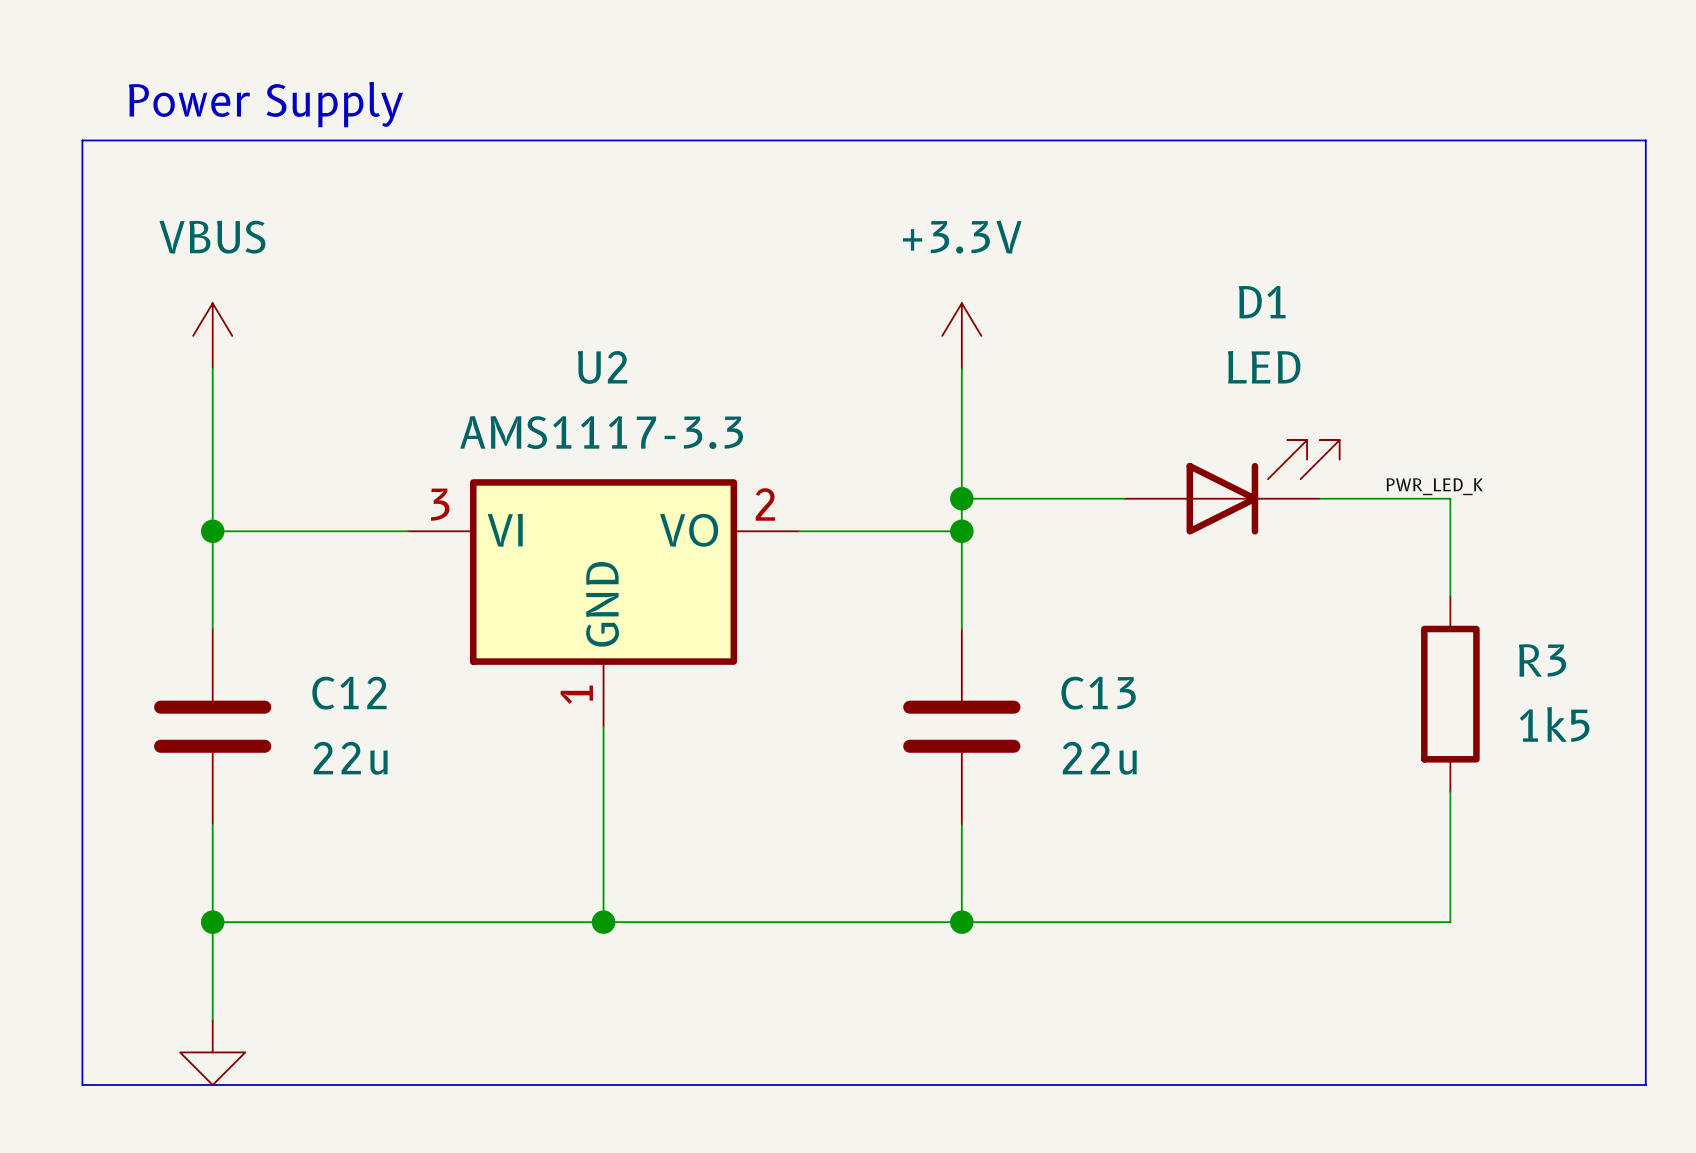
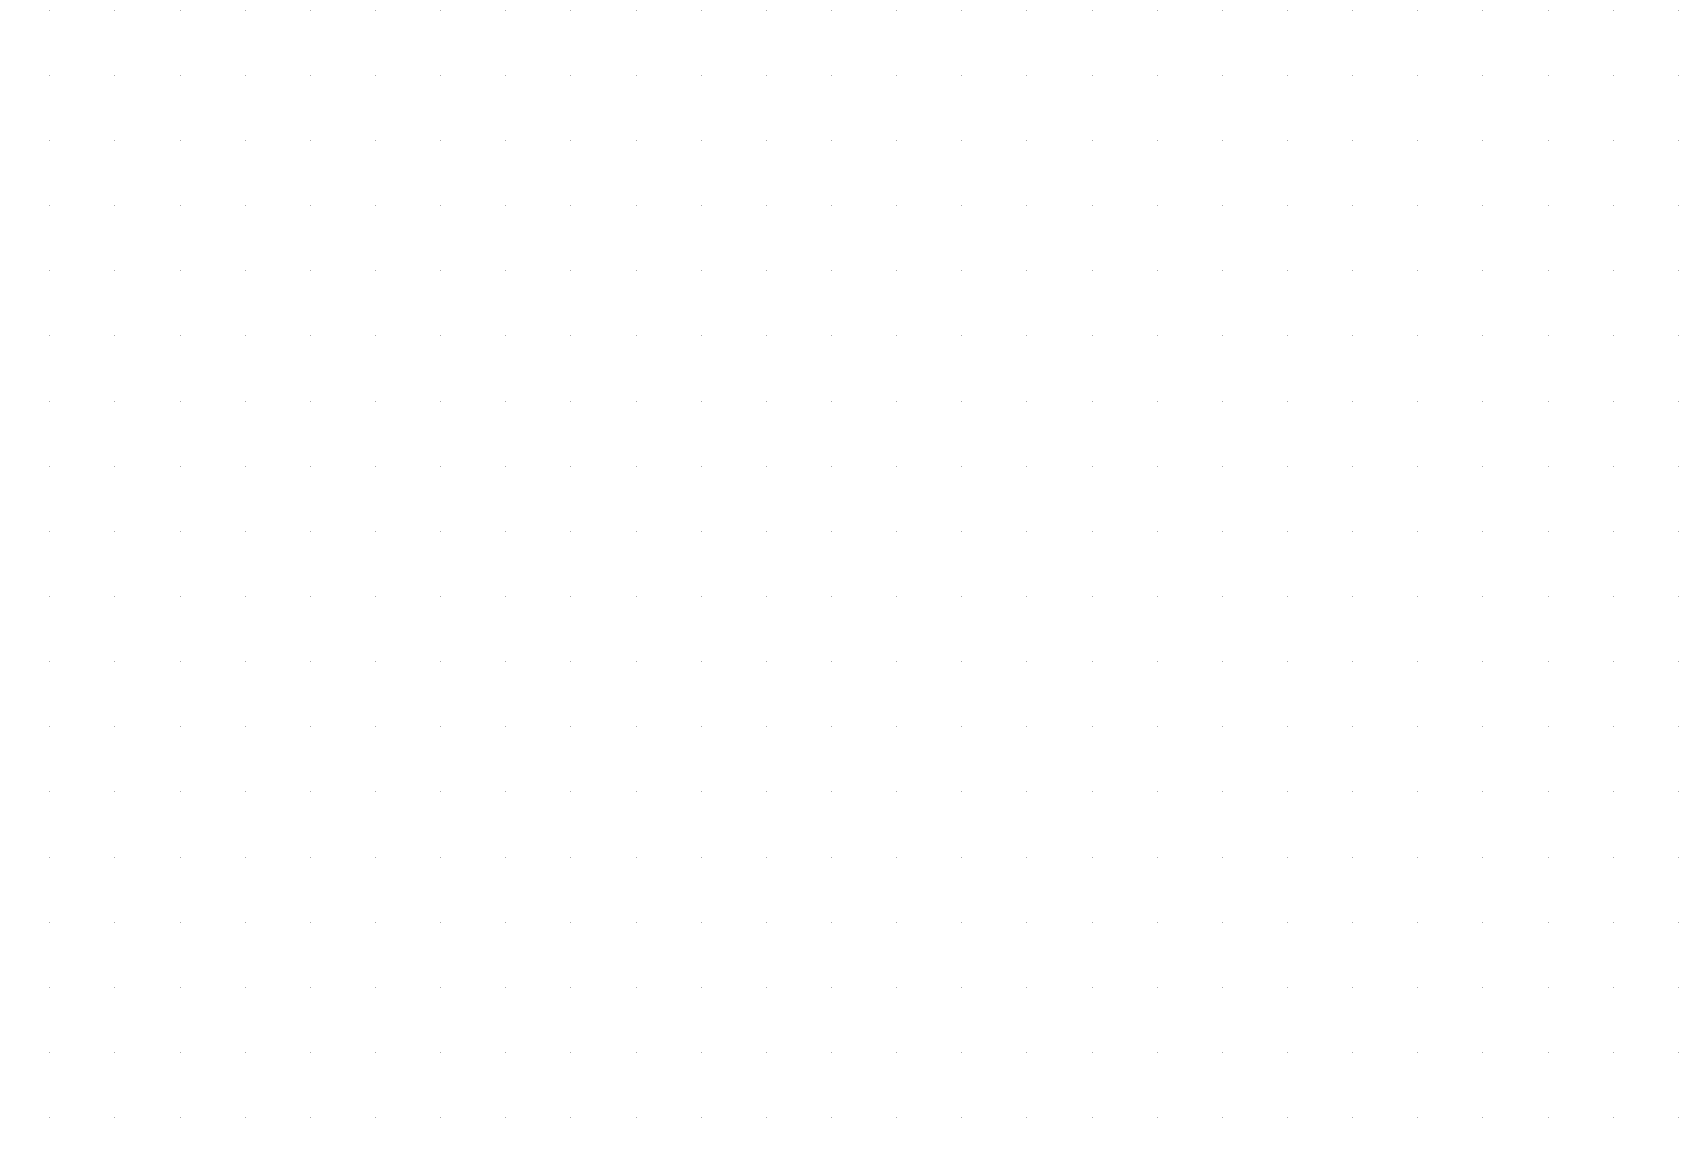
text: Power Supply (265, 104) -> none
line: (82, 140) (1645, 140) (1645, 1084) (82, 1084) (82, 140) -> none
power symbol: VBUS (212, 335) -> none
power symbol: +3.3V (961, 335) -> none
wire: (212, 368) (212, 629) -> none
wire: (961, 368) (961, 629) -> none
label: PWR_LED_K (1434, 486) -> none
D1: LED (1232, 487) -> none
wire: (961, 498) (1124, 498) -> none
junction: (961, 498) -> none
wire: (1320, 498) (1450, 498) (1450, 596) -> none
wire: (212, 531) (408, 531) -> none
junction: (212, 531) -> none
wire: (798, 531) (961, 531) -> none
junction: (961, 531) -> none
U2: AMS1117-3.3 (603, 602) -> none
R3: 1k5 (1450, 694) -> none
C12: 22u (212, 726) -> none
wire: (603, 726) (603, 922) -> none
C13: 22u (961, 726) -> none
wire: (1450, 791) (1450, 922) (212, 922) -> none
wire: (212, 824) (212, 1019) -> none
wire: (961, 824) (961, 922) -> none
junction: (212, 922) -> none
junction: (603, 922) -> none
junction: (961, 922) -> none
power symbol: (212, 1052) -> none

